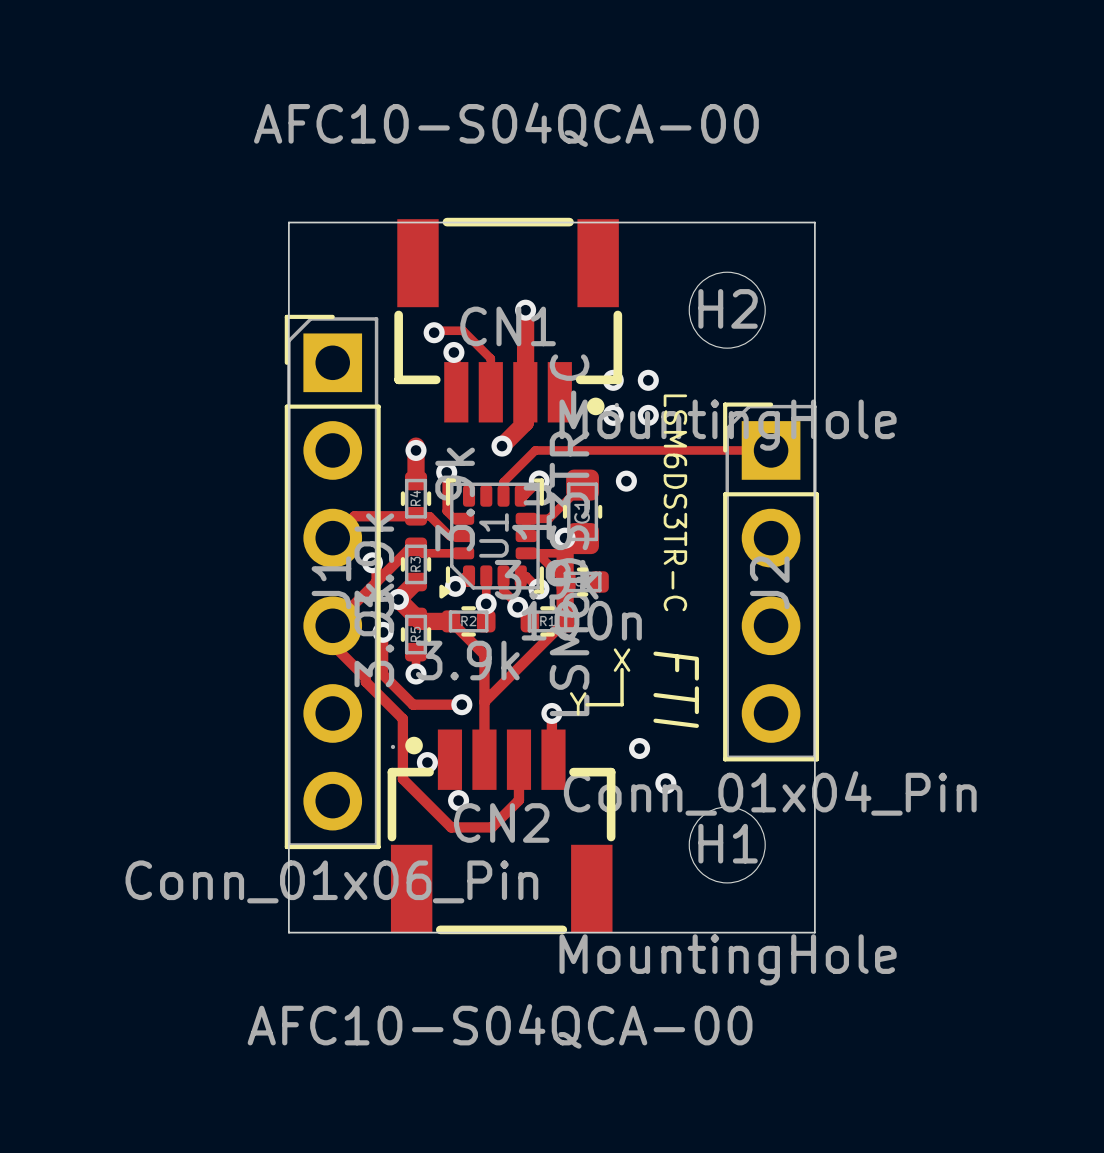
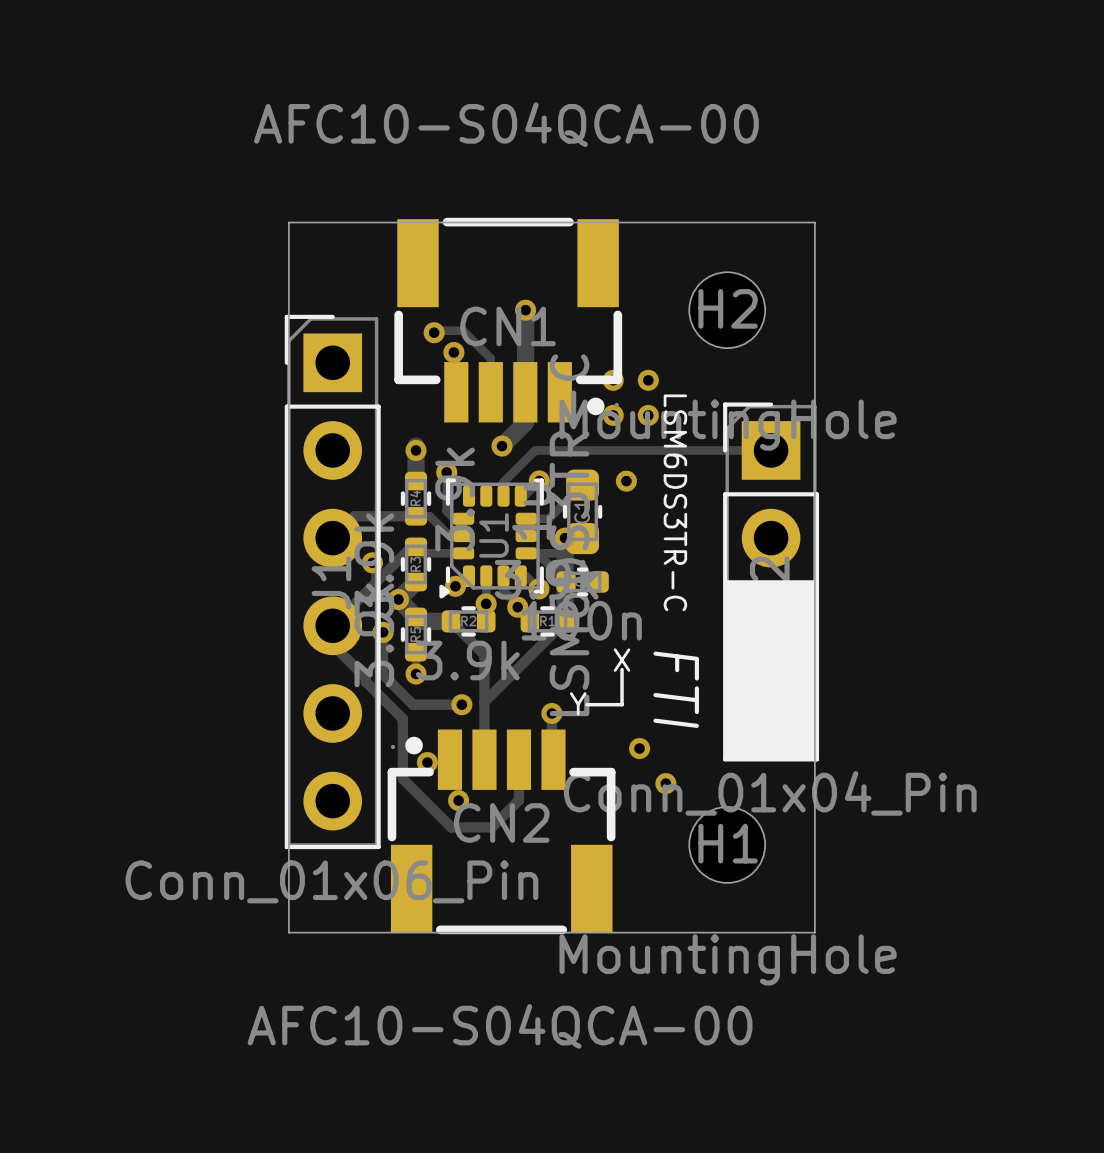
drawing: none -> [725, 580, 819, 762]

